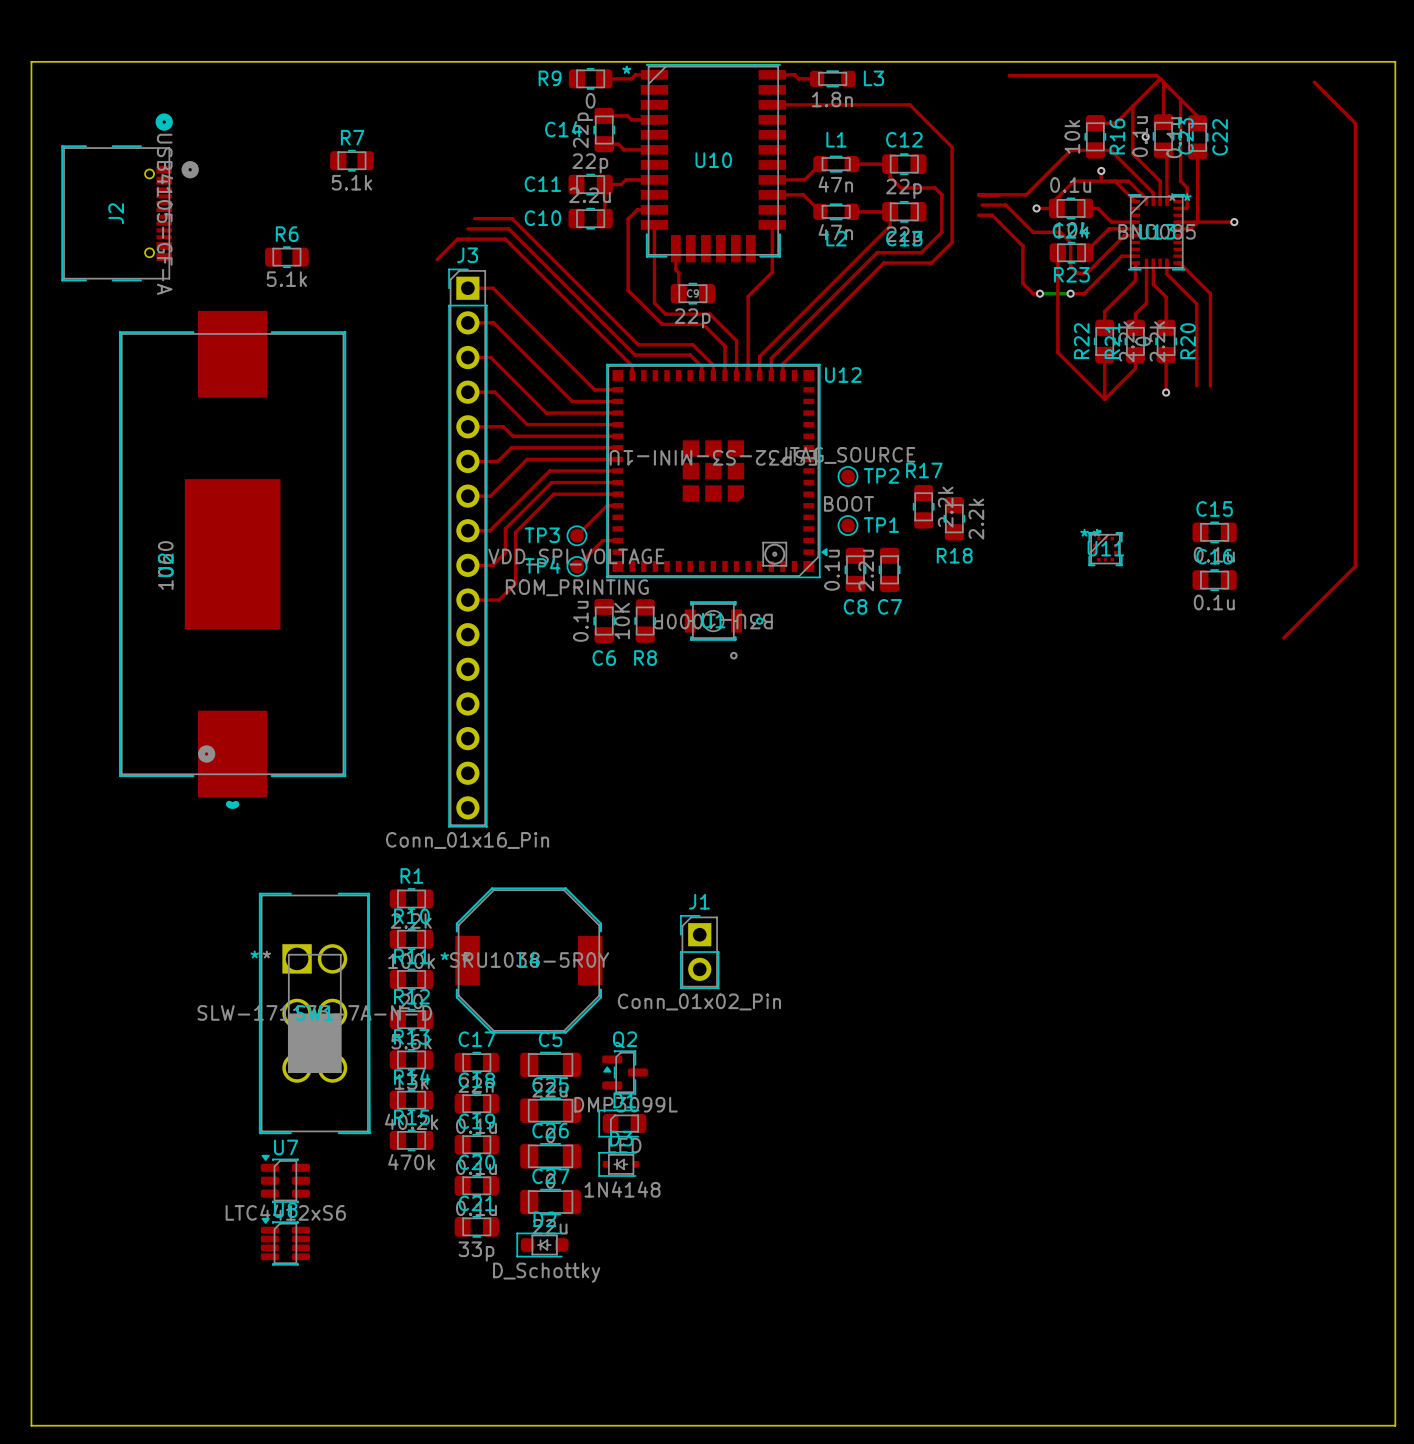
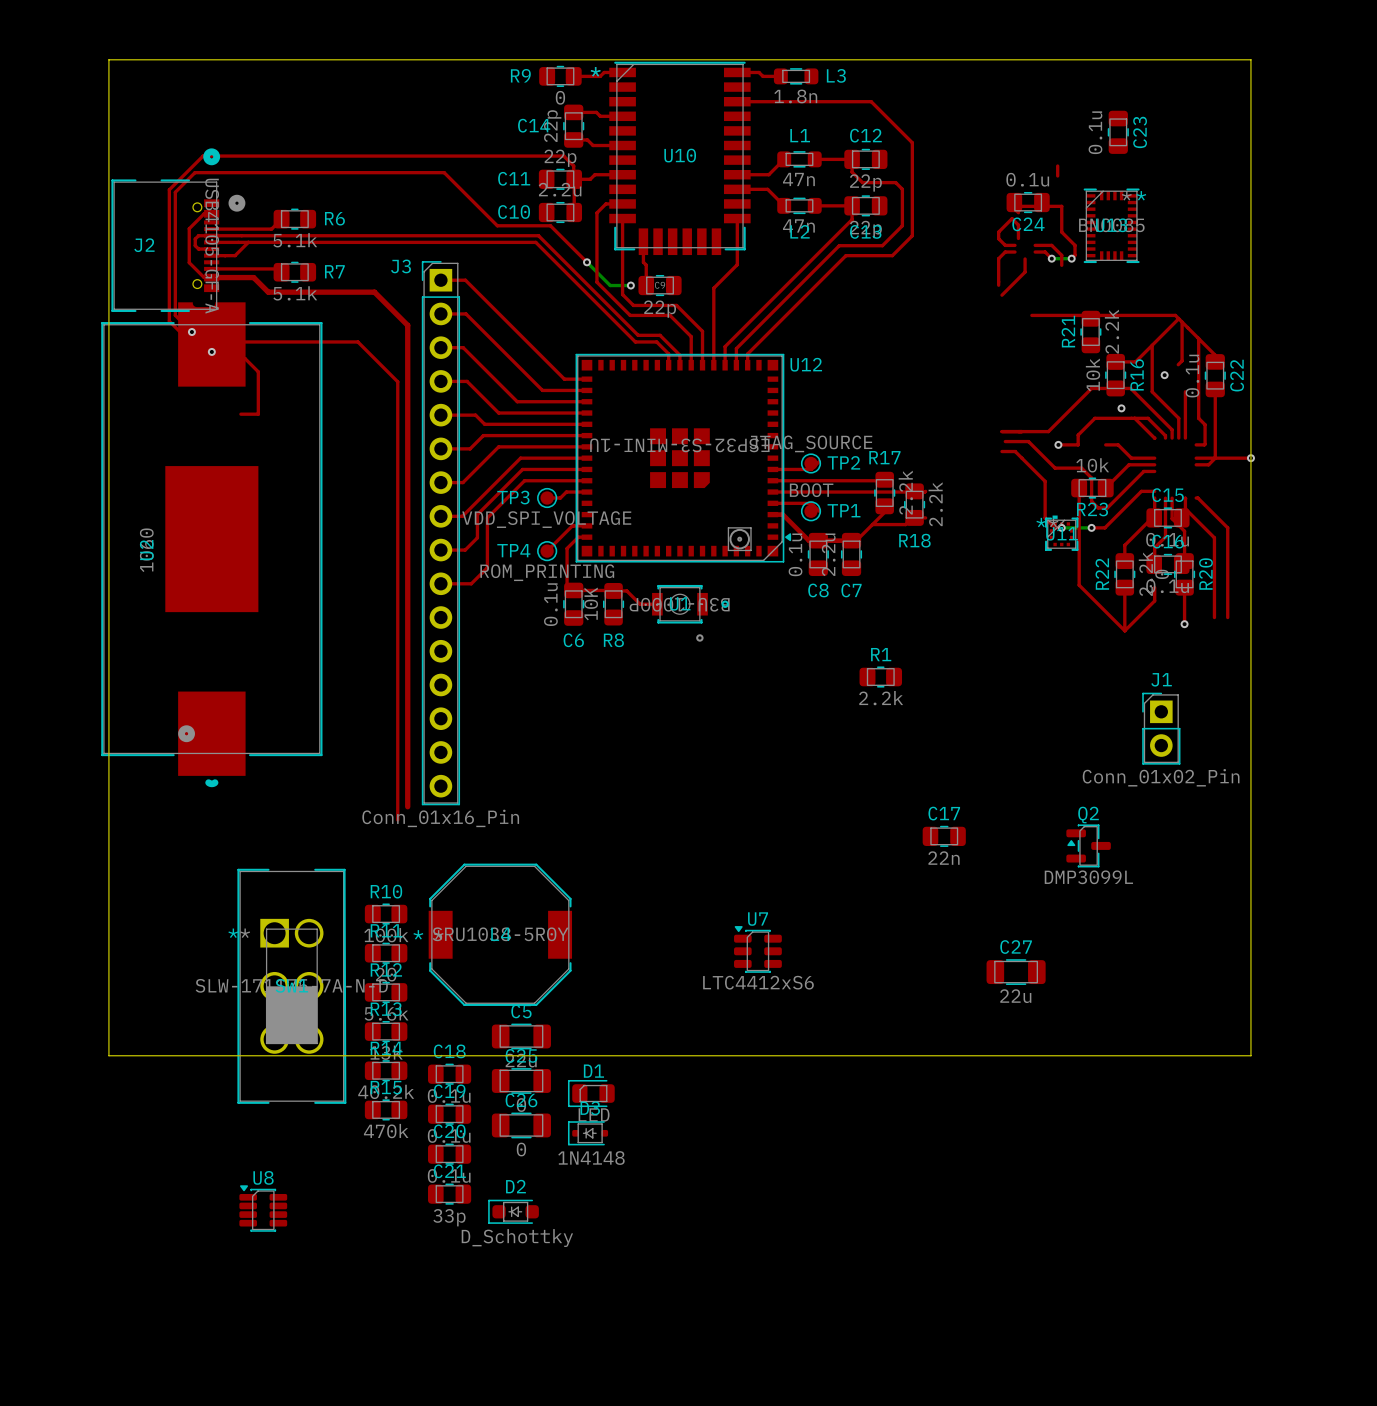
board edge: (126, 61) (31, 61) (31, 1425) (1395, 1425) (1395, 61) (1299, 61) -> (108, 59) (108, 1055) (1250, 1055) (1250, 59)
top track: (1009, 75) (1156, 75) (1197, 116) (1198, 122) -> (1031, 315) (1175, 315) (1215, 355) (1215, 361)
top track: (1160, 78) (1115, 123) (1095, 123) -> (1178, 318) (1135, 361) (1115, 361)
top track: (1163, 82) (1163, 122) (1159, 126) -> (1182, 322) (1182, 360) (1178, 364)
top track: (1314, 82) (1355, 123) (1355, 566) (1283, 638) -> none
top track: (1180, 99) (1180, 181) (1187, 187) (1187, 207) (1178, 208) -> (1198, 338) (1198, 418) (1205, 424) (1205, 444) (1196, 444)
top track: (1132, 106) (1132, 153) (1160, 181) (1160, 201) -> (1152, 345) (1152, 391) (1178, 418) (1178, 438)
R16 position: (1095, 136) -> (1115, 375)
via: (1145, 136) -> none
R7 name position: R7 (352, 137) -> R7 (334, 271)
C22 position: (1197, 137) -> (1215, 375)
top track: (1197, 151) (1197, 222) (1190, 228) (1178, 228) -> (1215, 389) (1215, 458) (1208, 464) (1196, 464)
top track: (1166, 153) (1166, 201) -> (1185, 391) (1185, 438)
R7 position: (351, 160) -> (294, 272)
via: (1101, 170) -> none
top track: none -> (574, 175) (573, 166) (563, 156) (203, 156) (169, 189) (169, 321) (190, 341) (357, 341) (397, 381) (397, 820)
top track: (1114, 181) (1135, 201) -> (1134, 418) (1154, 438)
top track: (978, 194) (1026, 194) (1070, 150) (1110, 150) (1153, 192) (1153, 201) -> (1001, 431) (1048, 431) (1091, 388) (1130, 388) (1172, 429) (1172, 438)
J2 position: (130, 197) -> (178, 230)
top track: (1146, 201) (1146, 199) (1128, 181) (1074, 181) (1056, 198) (1056, 208) (1036, 208) -> (1165, 438) (1165, 435) (1148, 418) (1094, 418) (1078, 435) (1078, 444) (1058, 444)
top track: (982, 205) (1005, 205) (1033, 232) (1060, 232) (1070, 242) (1070, 266) (1077, 273) (1086, 273) (1124, 235) (1135, 235) -> (1005, 441) (1028, 441) (1055, 468) (1081, 468) (1091, 478) (1091, 501) (1098, 507) (1107, 507) (1143, 471) (1154, 471)
via: (1036, 208) -> none
top track: (1085, 208) (1097, 208) (1111, 222) (1135, 222) -> (1105, 444) (1118, 444) (1131, 458) (1154, 458)
J2 name rotation: 0° (116, 213) -> 90° clockwise (144, 245)
top track: (978, 215) (992, 215) (1022, 245) (1022, 283) (1033, 293) (1039, 293) -> (1001, 451) (1015, 451) (1045, 481) (1045, 517) (1055, 527) (1061, 527)
top track: (474, 218) (512, 218) -> (191, 332) (175, 315) (175, 192) (194, 172) (444, 172) (484, 212)
top track: none -> (1018, 212) (1012, 206) (1061, 206) (1061, 232) (1075, 245) (1075, 255) (1071, 258)
top track: none -> (211, 213) (204, 213) (189, 228) (189, 262) (204, 277) (253, 277) (268, 292) (374, 292) (407, 325) (407, 806)
top track: (1178, 222) (1234, 222) -> (1196, 458) (1250, 458)
via: (1234, 222) -> none
top track: none -> (281, 219) (271, 229) (211, 229)
top track: (467, 228) (508, 228) (634, 355) (690, 355) (701, 366) -> (211, 242) (535, 242) (635, 341) (656, 341) (668, 353) (668, 356)
top track: (1135, 228) (1109, 228) (1085, 252) -> (1154, 464) (1128, 464) (1105, 488)
top track: (525, 232) (638, 344) (670, 344) -> (497, 225) (550, 225) (586, 262)
R6 name position: R6 (287, 234) -> R6 (334, 218)
top track: none -> (248, 242) (235, 255) (211, 255)
top track: (1057, 252) (1057, 352) (1104, 399) -> (1014, 245) (1005, 245) (998, 238) (998, 232) (1012, 218) (1018, 225) (1018, 238)
R23 position: (1071, 252) -> (1092, 488)
top track: none -> (1035, 245) (1051, 245) (1061, 255) (1061, 265)
J3 name position: J3 (467, 255) -> J3 (401, 266)
top track: none -> (211, 249) (198, 249) (195, 245) (195, 239) (198, 235) (538, 235) (638, 335)
top track: (1135, 256) (1121, 256) (1084, 293) (1070, 293) -> (1154, 491) (1141, 491) (1104, 527) (1091, 527)
R6 position: (286, 257) -> (294, 219)
top track: (437, 259) (457, 239) (505, 239) (632, 365) (632, 375) -> none
top track: none -> (1014, 252) (1005, 252) (998, 258) (998, 285)
top track: none -> (1035, 252) (1045, 252) (1051, 258)
top track: (1135, 263) (1135, 280) (1104, 311) (1104, 327) -> (1154, 498) (1154, 515) (1124, 545) (1124, 561)
top track: (1146, 263) (1146, 303) (1135, 314) (1135, 327) -> (1165, 498) (1165, 537) (1154, 547) (1154, 561)
top track: (1153, 263) (1153, 284) (1166, 297) (1166, 327) -> (1172, 498) (1172, 518) (1184, 531) (1184, 561)
top track: (1167, 263) (1166, 274) (1196, 303) (1196, 385) -> (1185, 498) (1185, 508) (1214, 537) (1214, 617)
top track: (1178, 263) (1210, 293) (1210, 385) -> (1196, 498) (1227, 527) (1227, 617)
top track: none -> (1025, 258) (1025, 272) (1001, 295)
bottom track: none -> (1051, 258) (1071, 258)
via: none -> (1051, 258)
via: none -> (1071, 258)
bottom track: none -> (586, 262) (610, 285) (630, 285)
via: none -> (586, 262)
top track: none -> (211, 268) (278, 268) (281, 272)
via: none -> (630, 285)
bottom track: (1039, 293) (1070, 293) -> (1061, 527) (1091, 527)
via: (1039, 293) -> none
via: (1070, 293) -> none
via: none -> (191, 332)
R22 position: (1104, 341) -> (1124, 574)
R20 position: (1166, 341) -> (1184, 574)
top track: (1104, 355) (1104, 399) -> (1124, 587) (1124, 630)
top track: (1135, 355) (1135, 368) (1104, 399) -> (1154, 587) (1154, 600) (1124, 630)
top track: (1166, 355) (1166, 392) -> (1184, 587) (1184, 624)
top track: none -> (211, 351) (218, 358) (245, 358) (258, 371) (258, 414) (240, 414)
via: none -> (211, 351)
via: none -> (1164, 375)
via: (1166, 392) -> none
via: none -> (1121, 408)
via: none -> (1058, 444)
via: none -> (1250, 458)
top track: none -> (819, 461) (811, 469) (772, 469)
top track: none -> (892, 478) (889, 480) (772, 480)
top track: none -> (1079, 488) (1079, 585) (1124, 630)
top track: (606, 505) (576, 535) -> (576, 492) (566, 492) (560, 498) (547, 498)
top track: none -> (925, 491) (772, 492)
top track: none -> (772, 503) (811, 503) (819, 511)
top track: none -> (892, 504) (856, 540) (808, 540) (782, 514) (772, 514)
top track: none -> (925, 517) (912, 517) (905, 524) (872, 524)
TP3 position: (576, 535) -> (547, 498)
via: none -> (1061, 527)
via: none -> (1091, 527)
top track: none -> (586, 537) (578, 537) (567, 548) (567, 590) (626, 590) (640, 604) (657, 604)
via: none -> (1184, 624)
R1 position: (411, 898) -> (880, 677)
J1 position: (699, 952) -> (1161, 728)
C17 position: (476, 1062) -> (944, 836)
Q2 position: (625, 1072) -> (1088, 845)
U7 position: (285, 1178) -> (757, 949)
C27 position: (550, 1202) -> (1016, 972)

